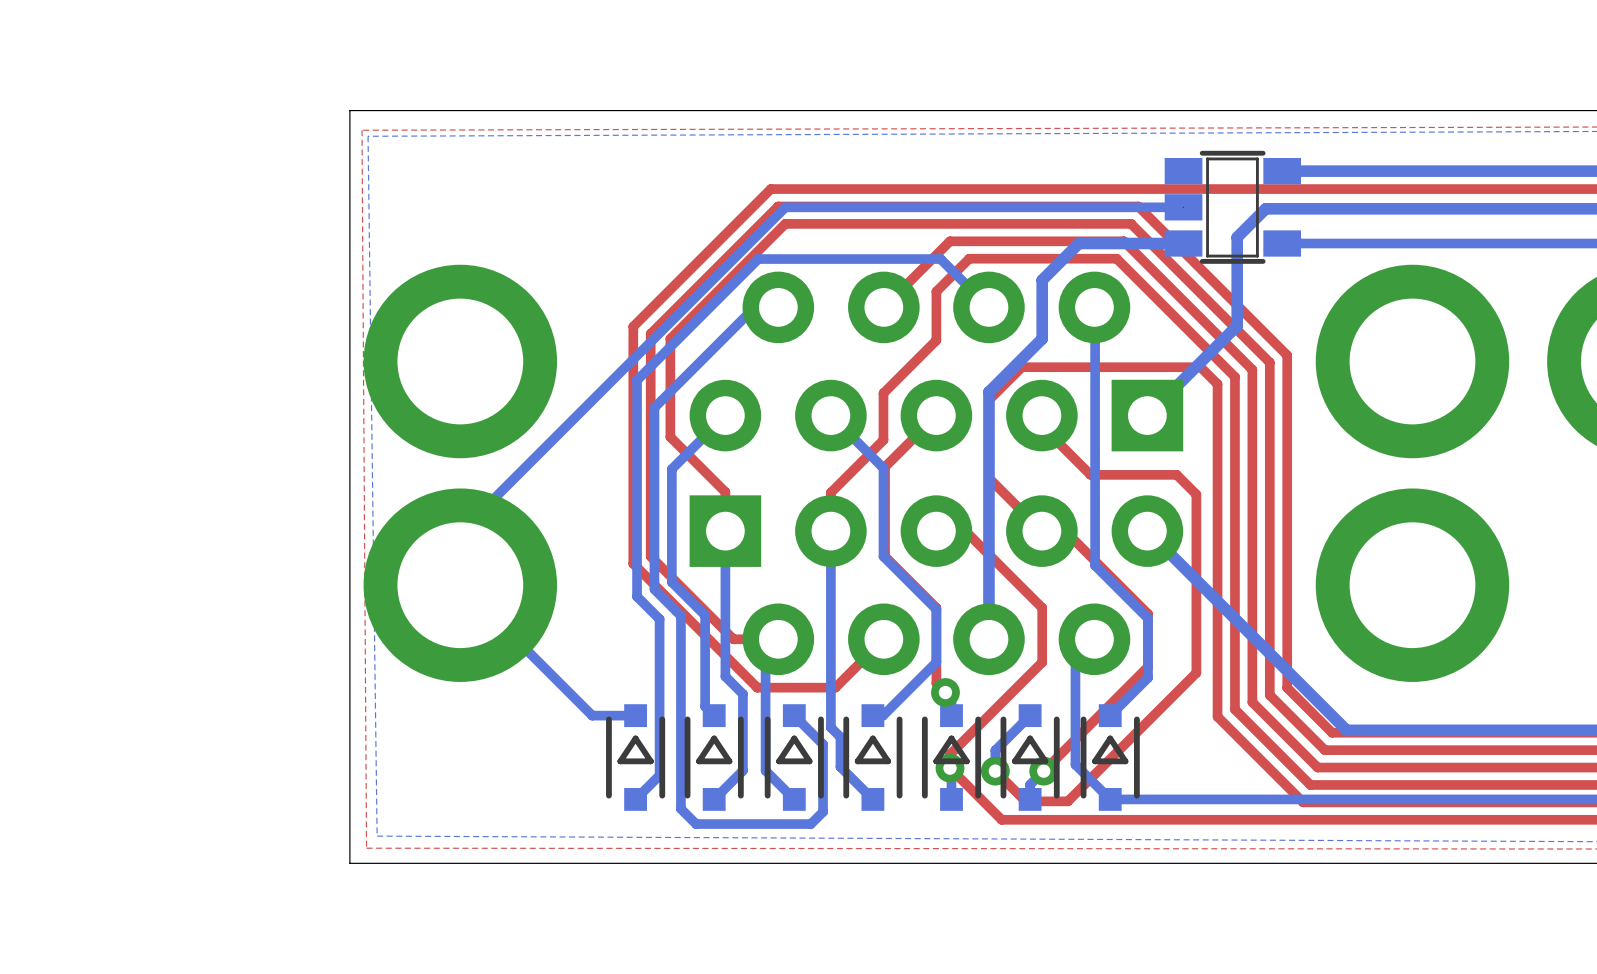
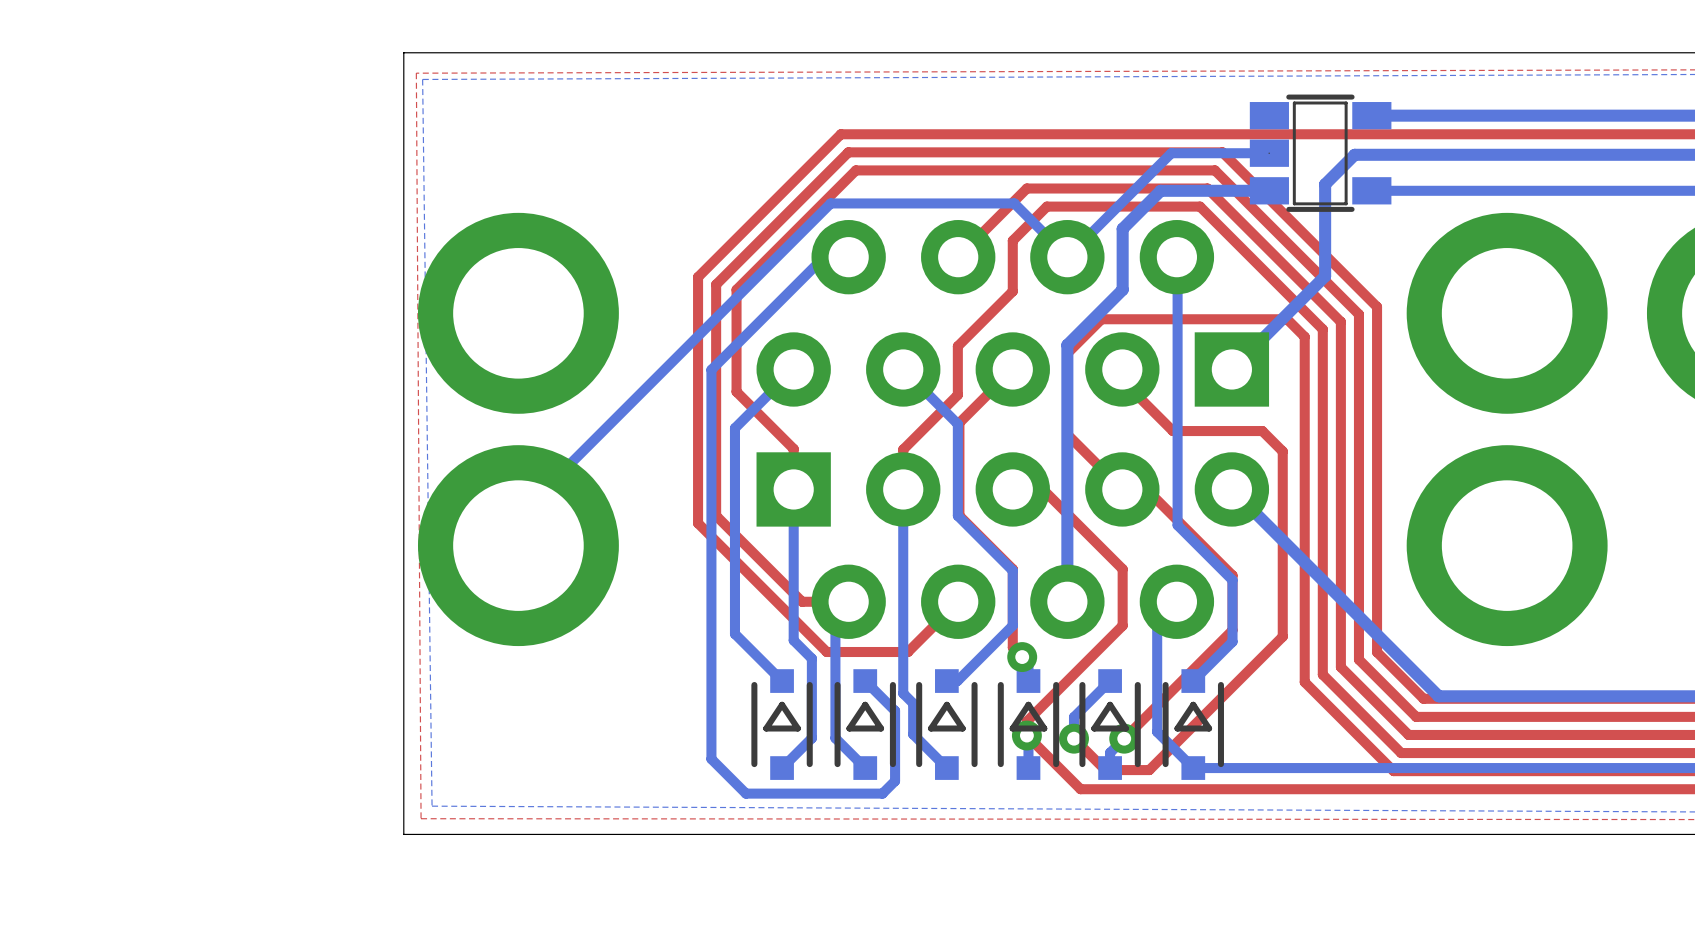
bottom track: (1089, 207) (785, 207) (460, 532) (460, 556) -> (1067, 256) (1014, 203) (830, 203) (518, 515)
bottom track: (988, 307) (940, 259) (758, 259) (637, 380) (637, 596) (659, 619) (659, 775) (635, 799) -> (1067, 257) (1171, 153)
bottom track: (654, 407) (654, 589) (680, 615) (680, 808) (696, 824) -> (720, 361) (711, 369) (711, 759) (745, 793) (763, 793)
bottom track: (671, 469) (671, 582) (705, 615) (705, 706) -> (738, 425) (734, 428) (734, 633) (772, 671)
bottom track: (460, 583) (592, 715) (635, 715) -> none
part: (635, 757) -> none

